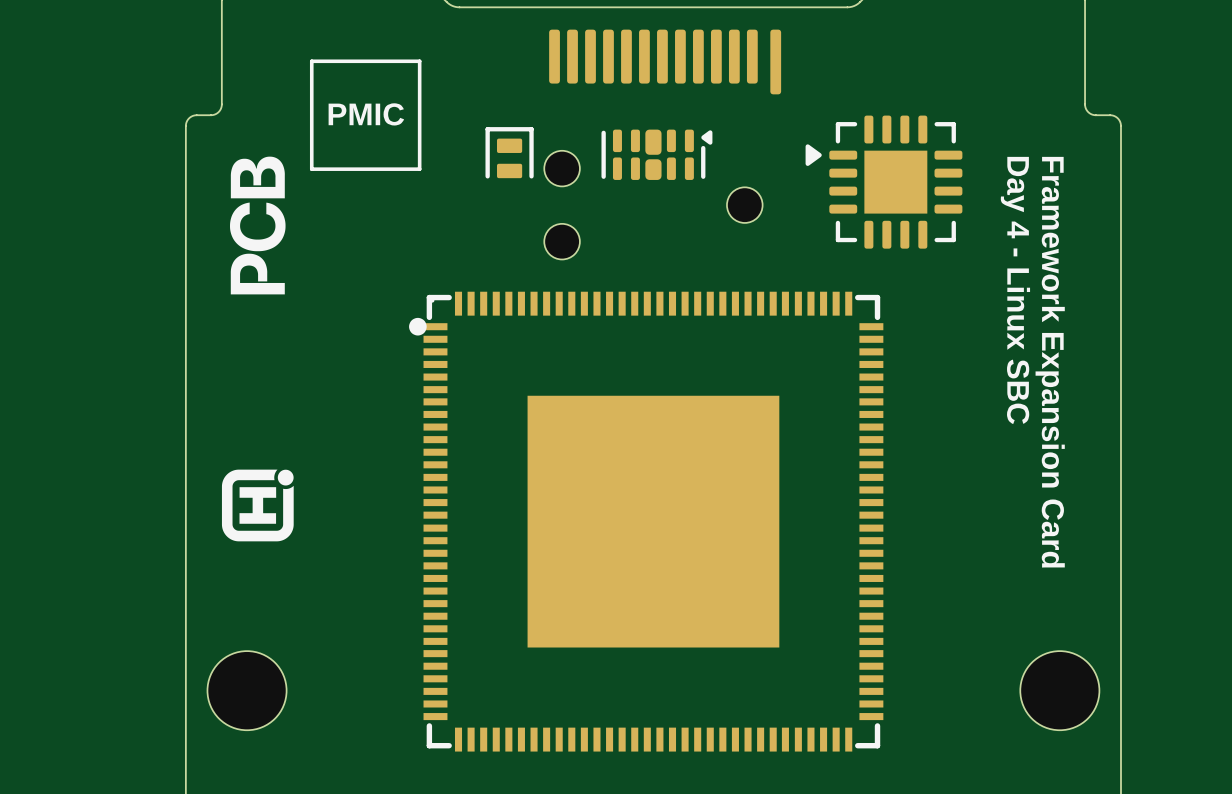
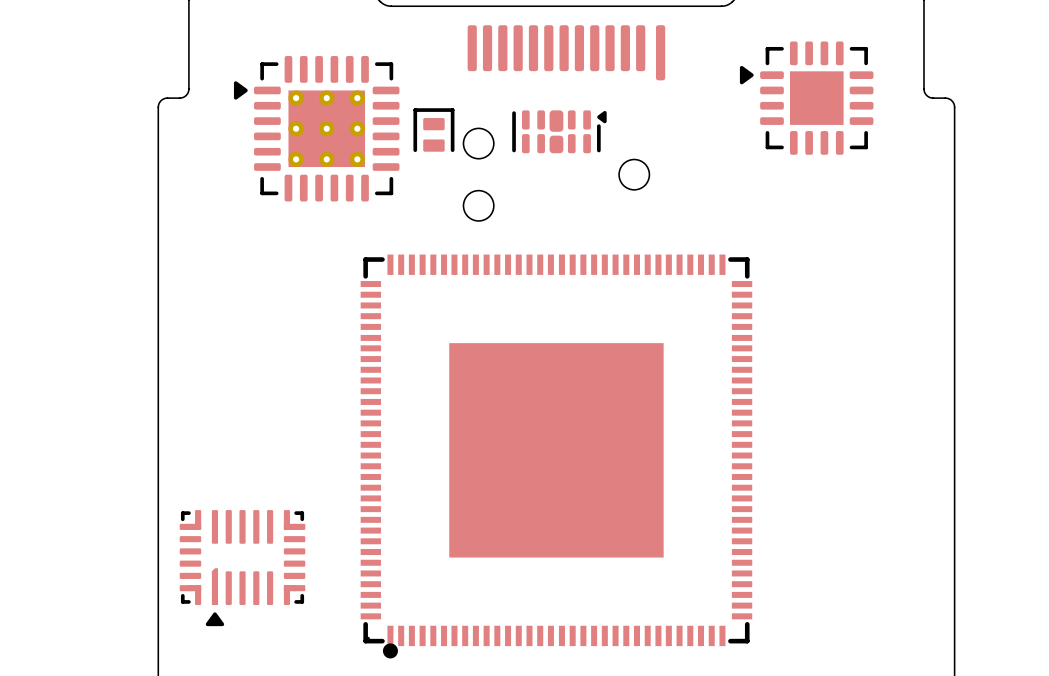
line: (311, 61) (419, 61) (419, 169) (311, 169) (311, 61) -> none
text: PMIC (366, 114) -> none
part: none -> (316, 128)
drawing: [221, 156, 294, 542] -> none
part position: (883, 182) -> (806, 98)
text: Day 4 - Linux SBC (1015, 290) -> none
text: Framework Expansion Card (1050, 362) -> none
part rotation: 0° (646, 521) -> 90° counterclockwise (556, 456)
part: none -> (242, 568)
part: (247, 690) -> none
part: (1059, 690) -> none

